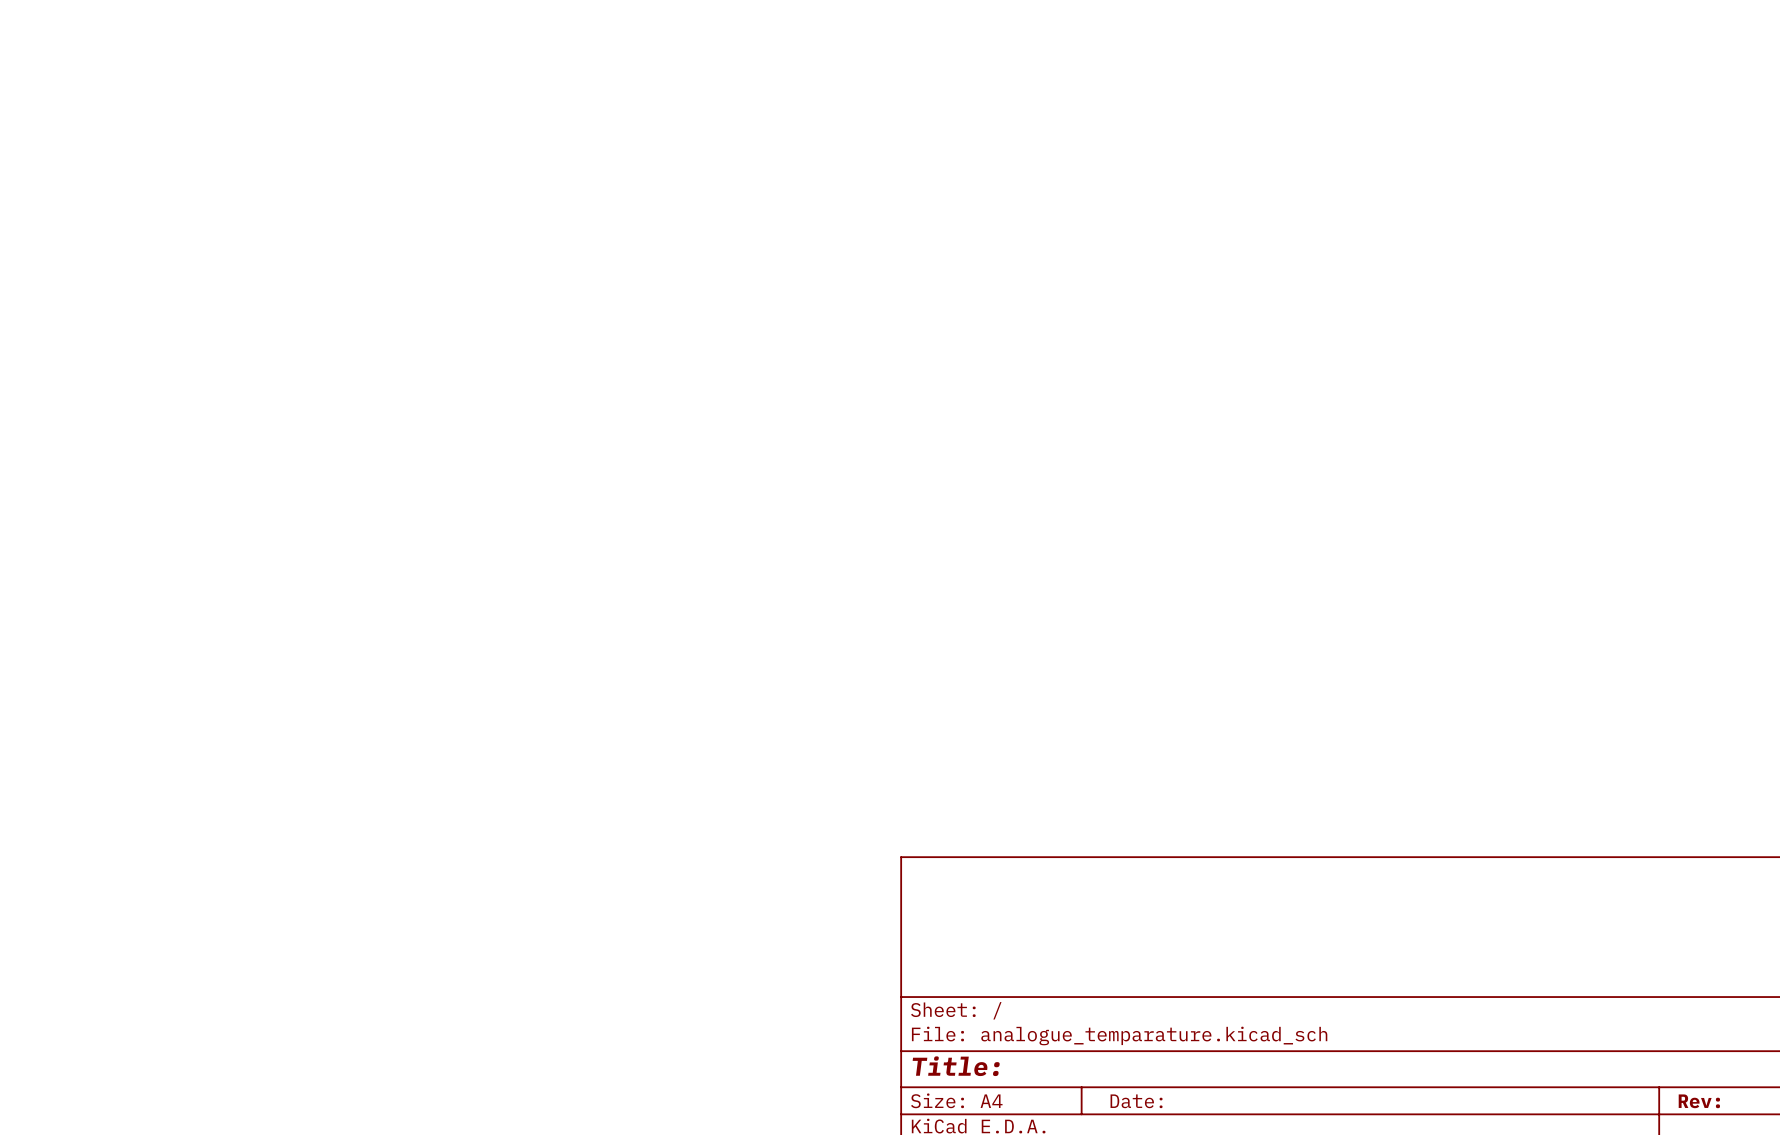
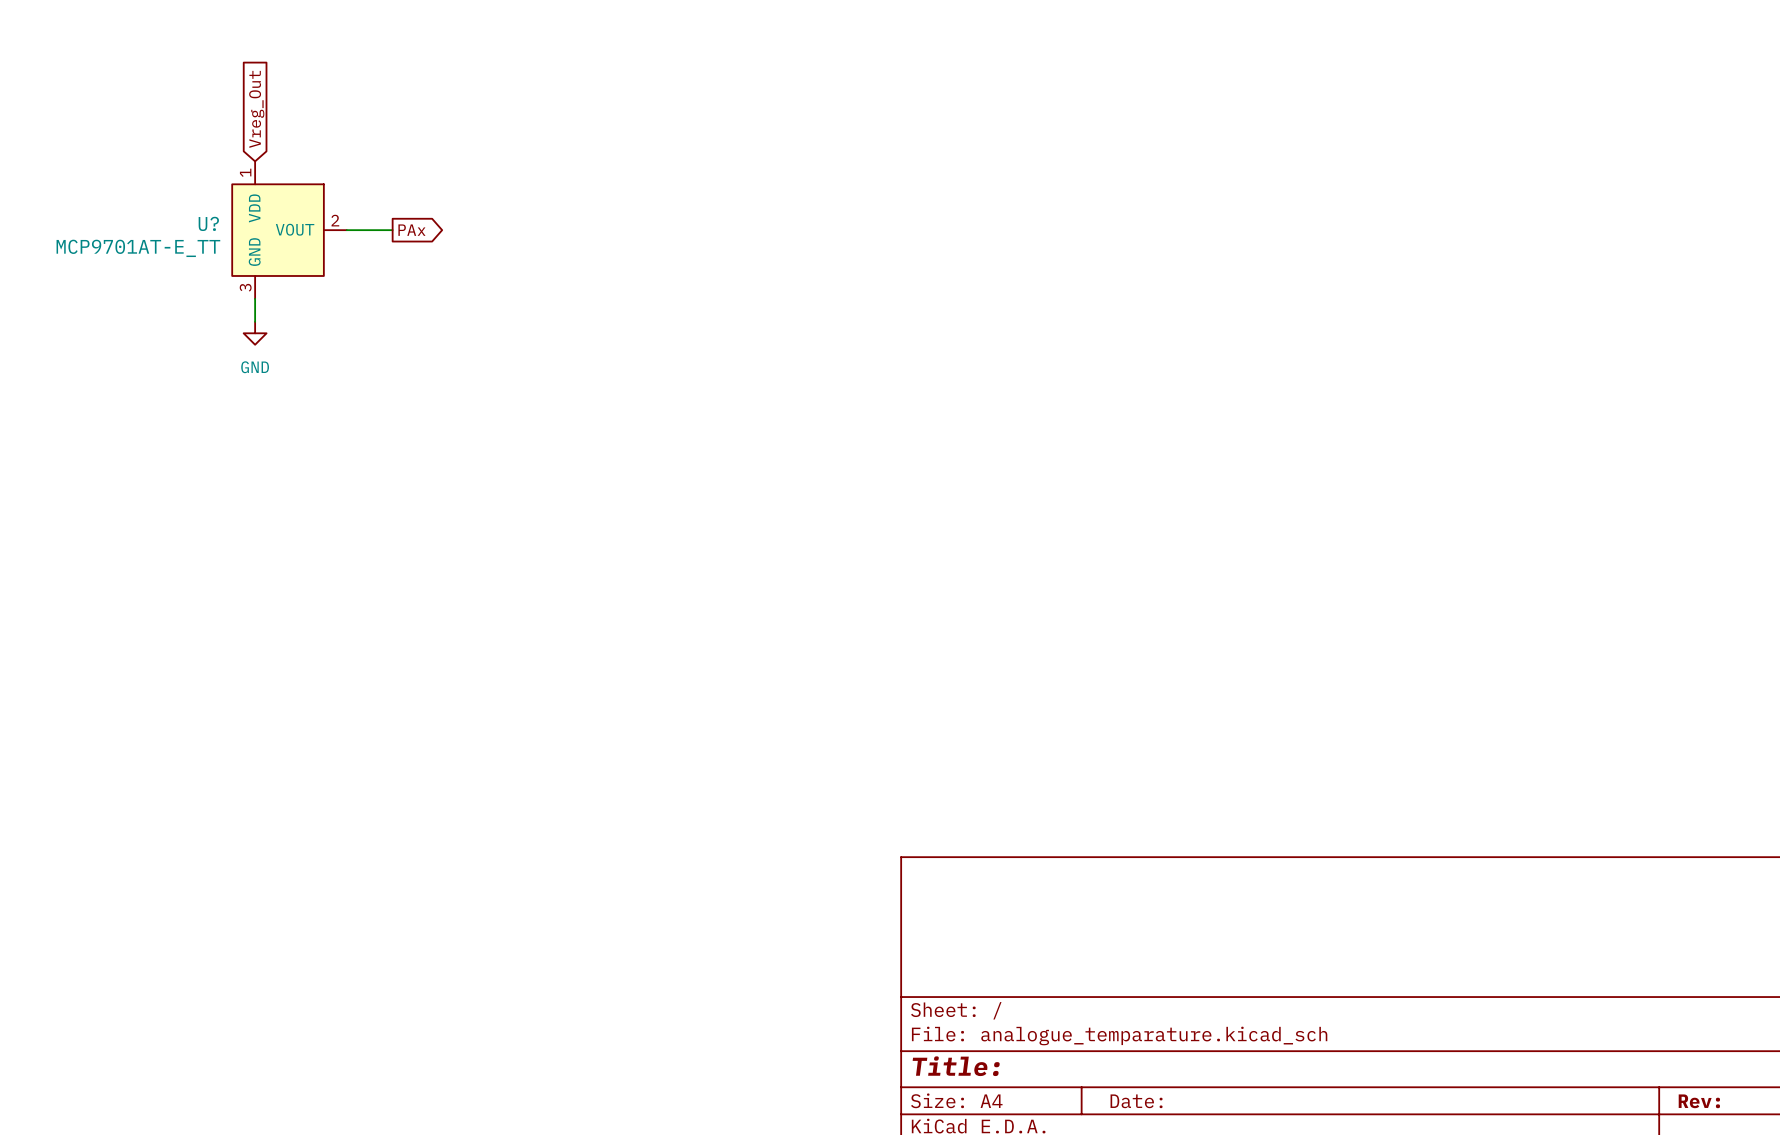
global label: none -> Vreg_Out (256, 109)
U?: none -> MCP9701AT-E_TT (289, 230)
wire: none -> (346, 230) (392, 230)
global label: none -> PAx (411, 230)
wire: none -> (255, 298) (255, 321)
power symbol: none -> GND (255, 333)

